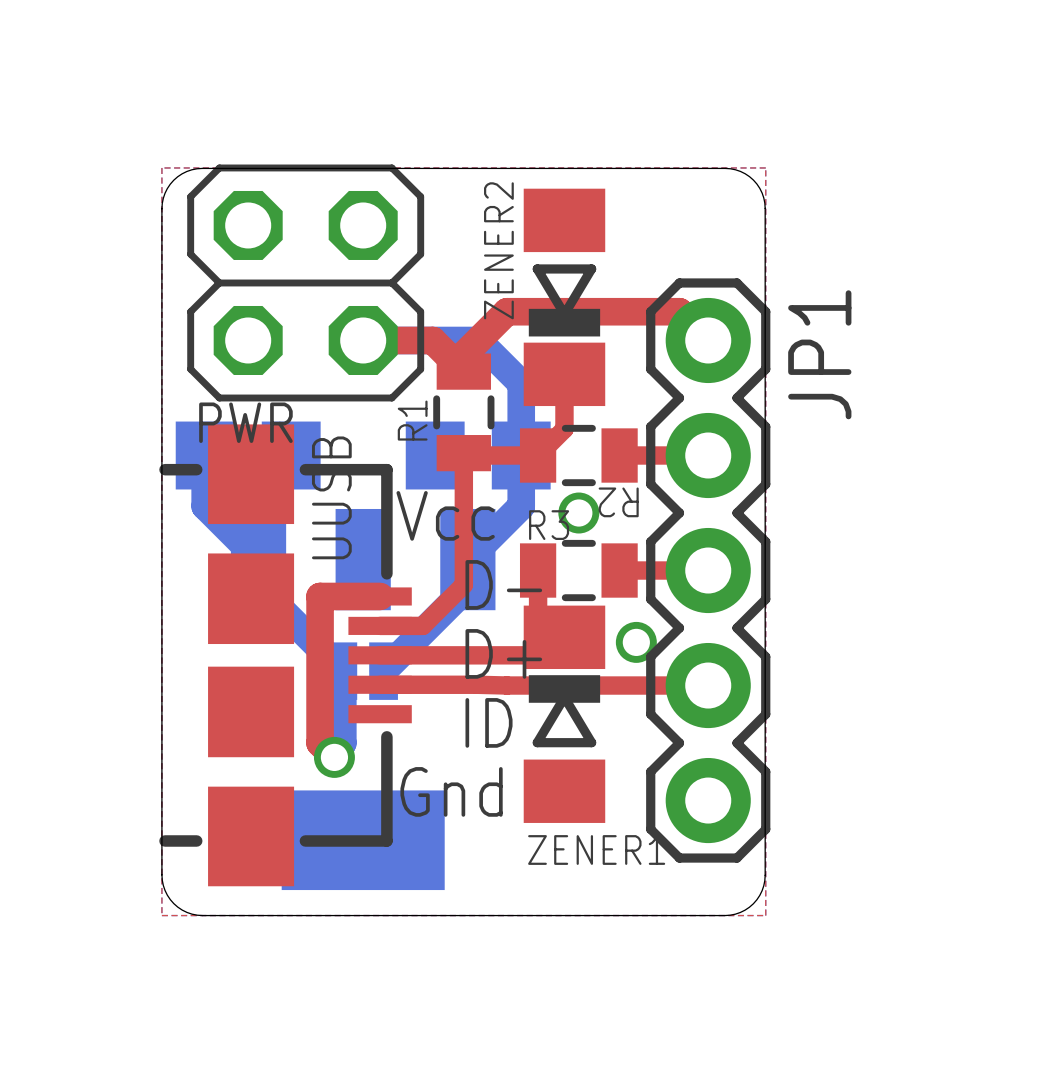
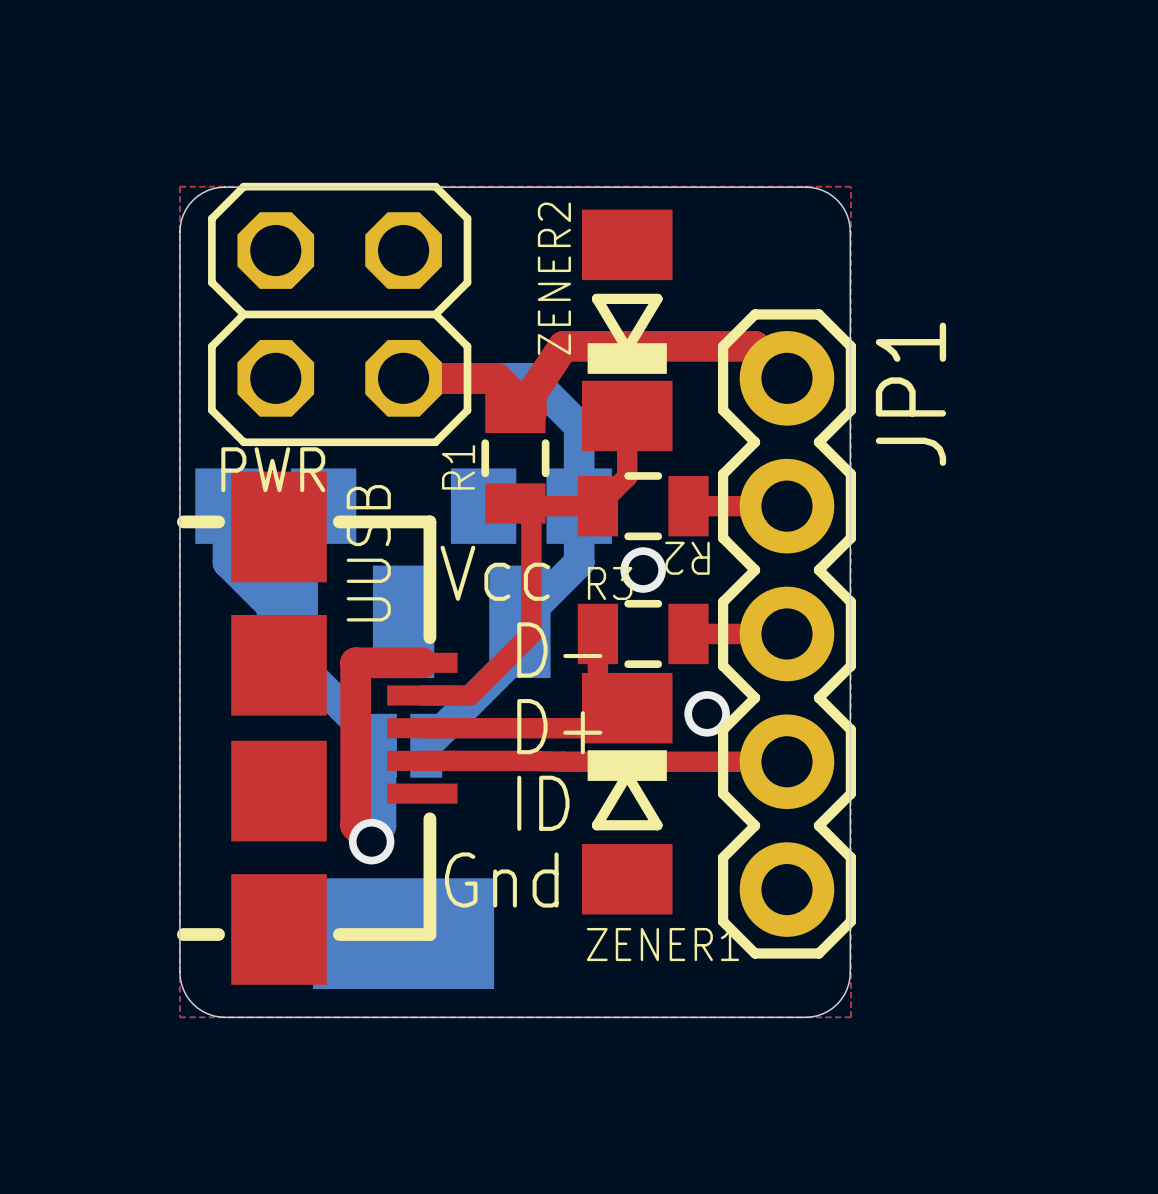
top track: (506, 311) (463, 354) (463, 371) (432, 340) -> (563, 346) (531, 394) (531, 412) (496, 378) (480, 378)
top track: (466, 455) (463, 453) (463, 584) -> (518, 506) (531, 503) (531, 633) (515, 649)

